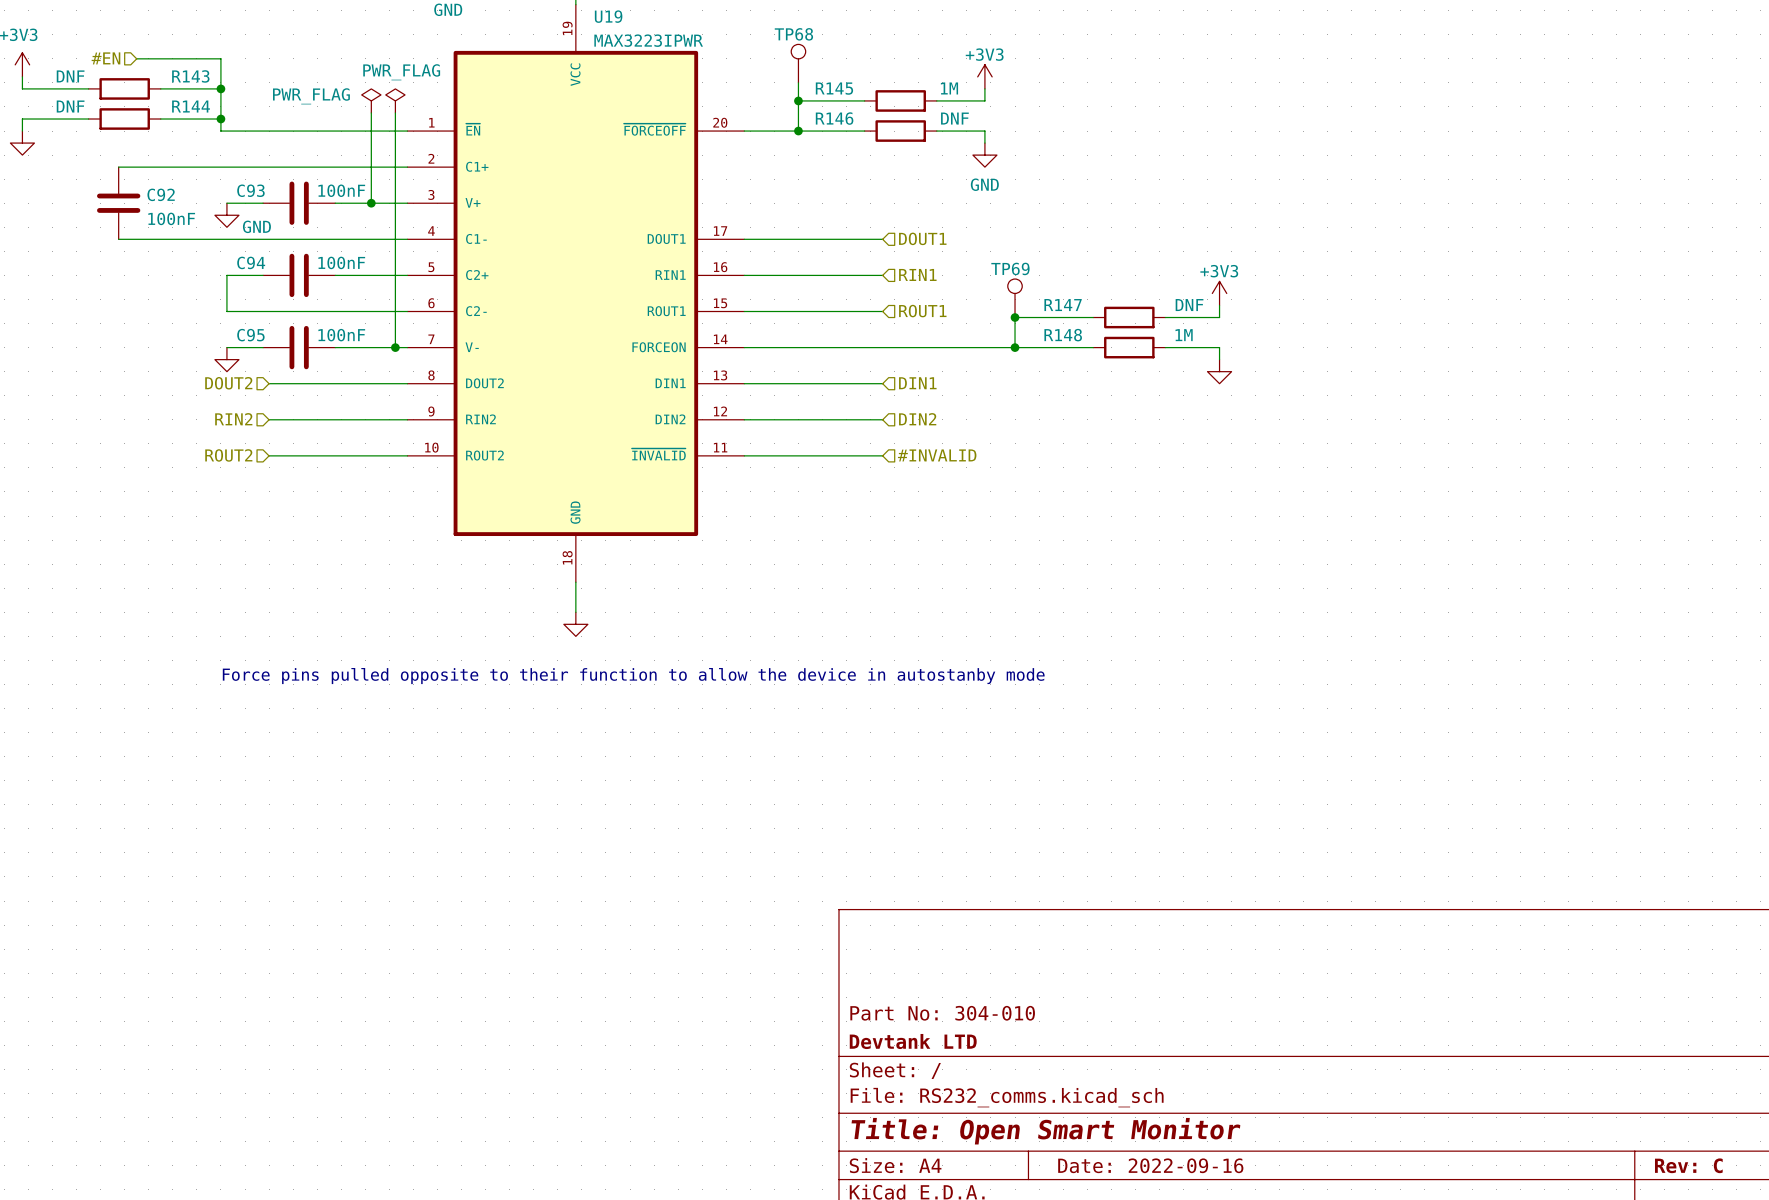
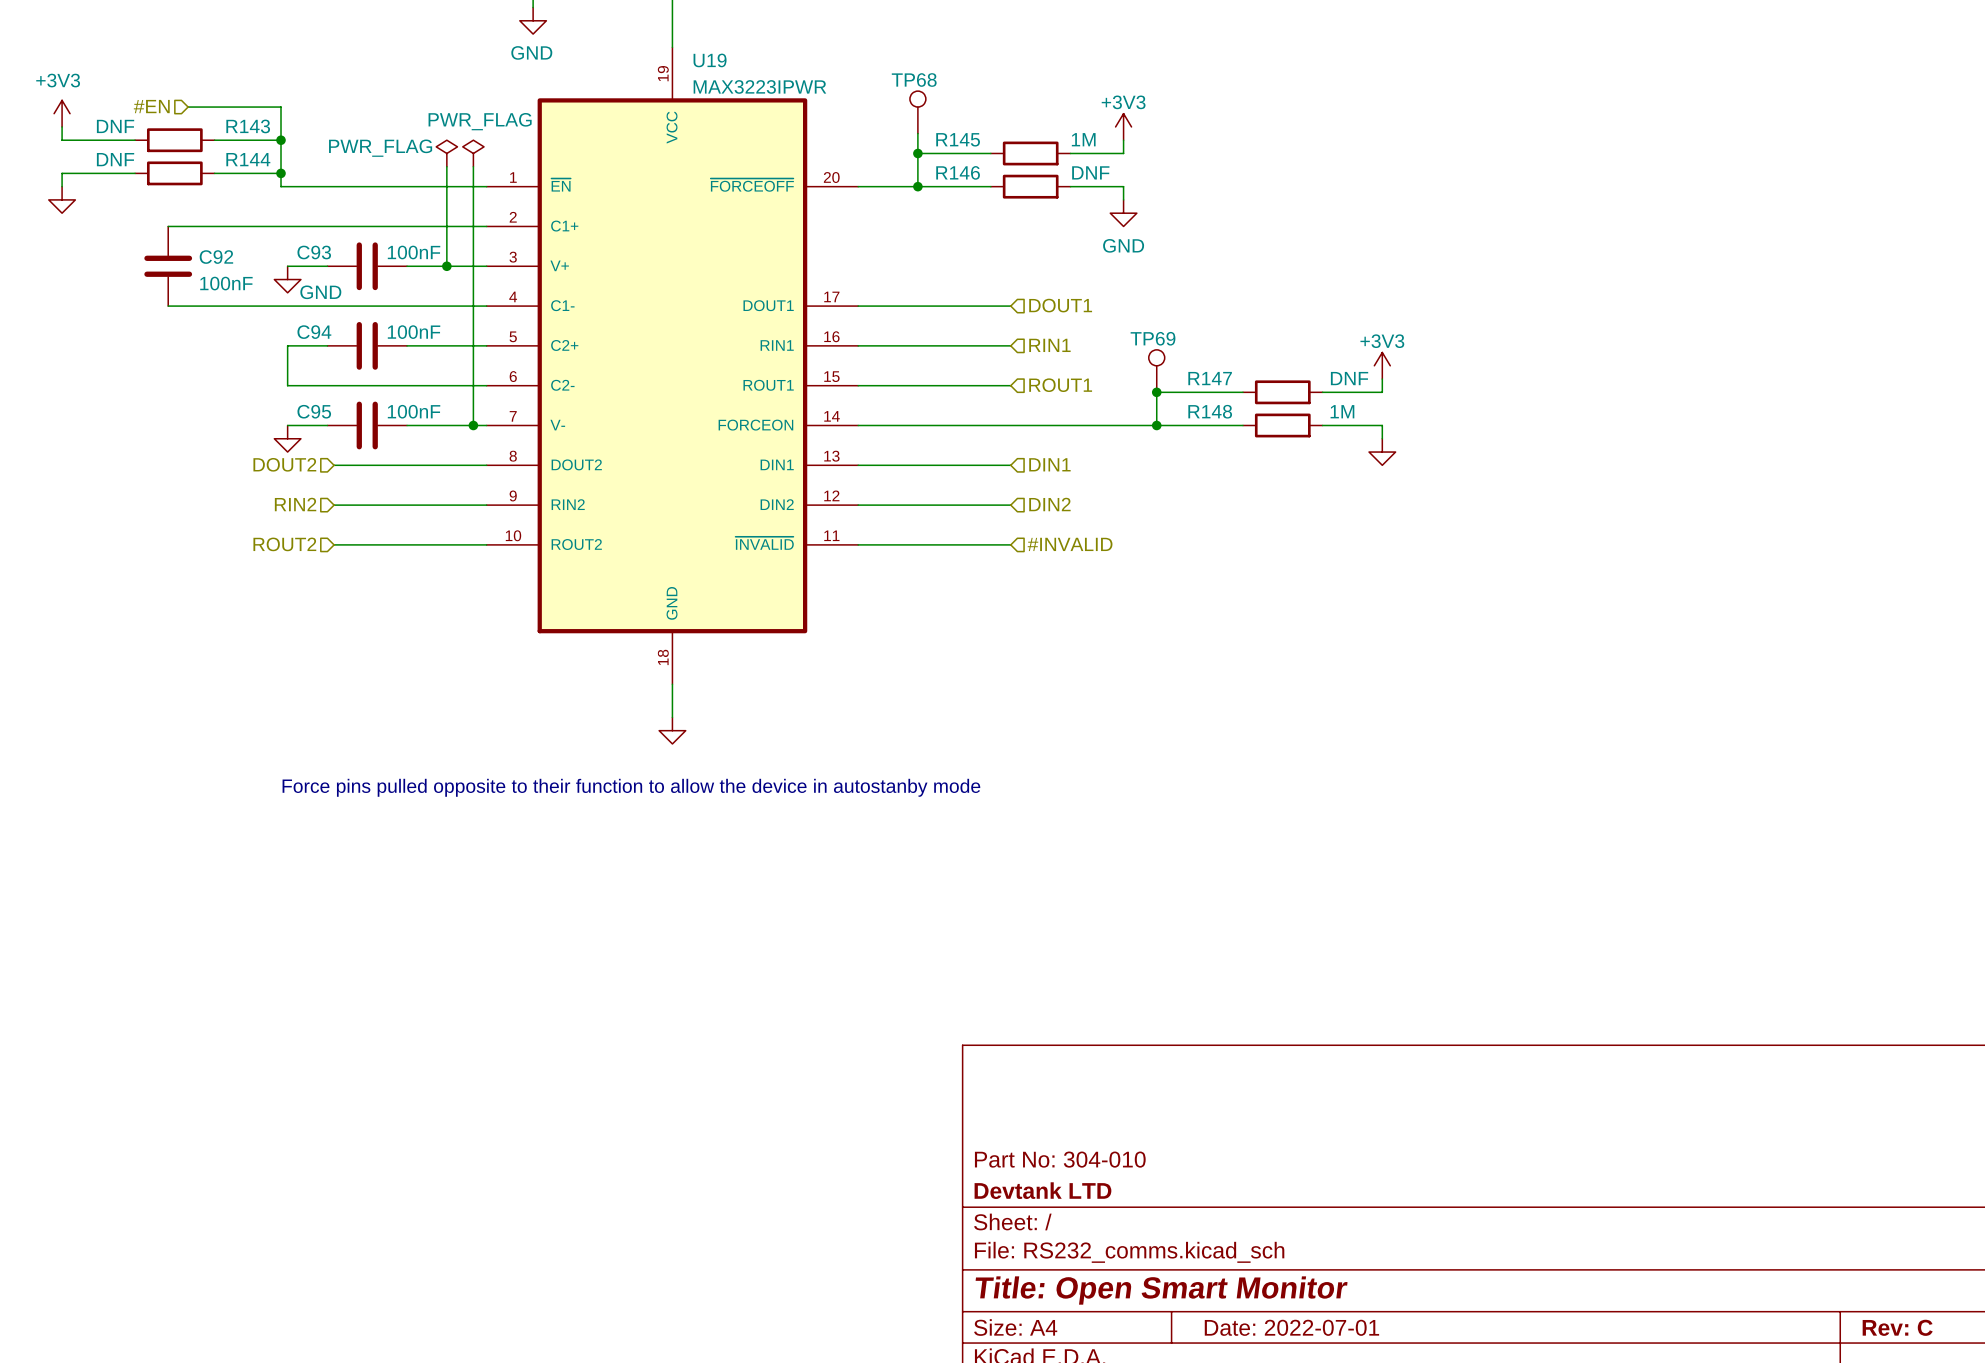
title block: Date: 2022-09-16 (1150, 1165) -> Date: 2022-07-01 (1291, 1327)

